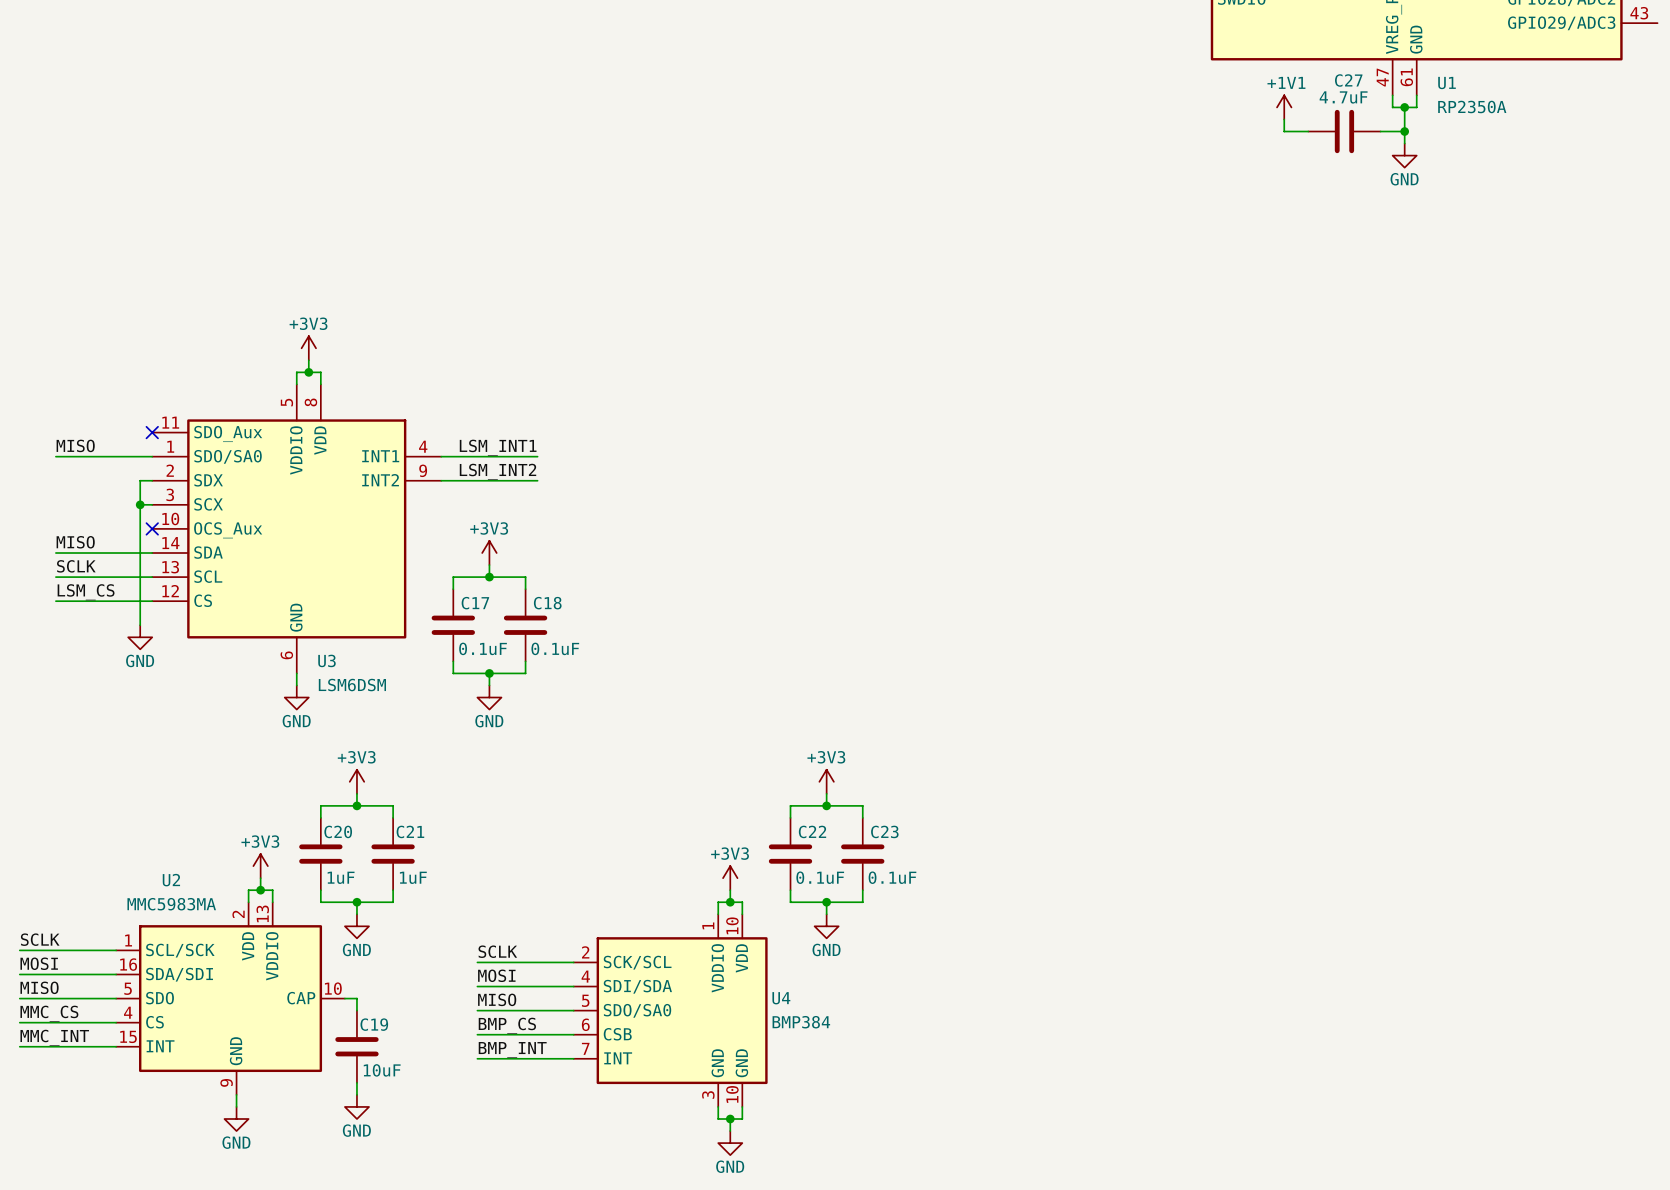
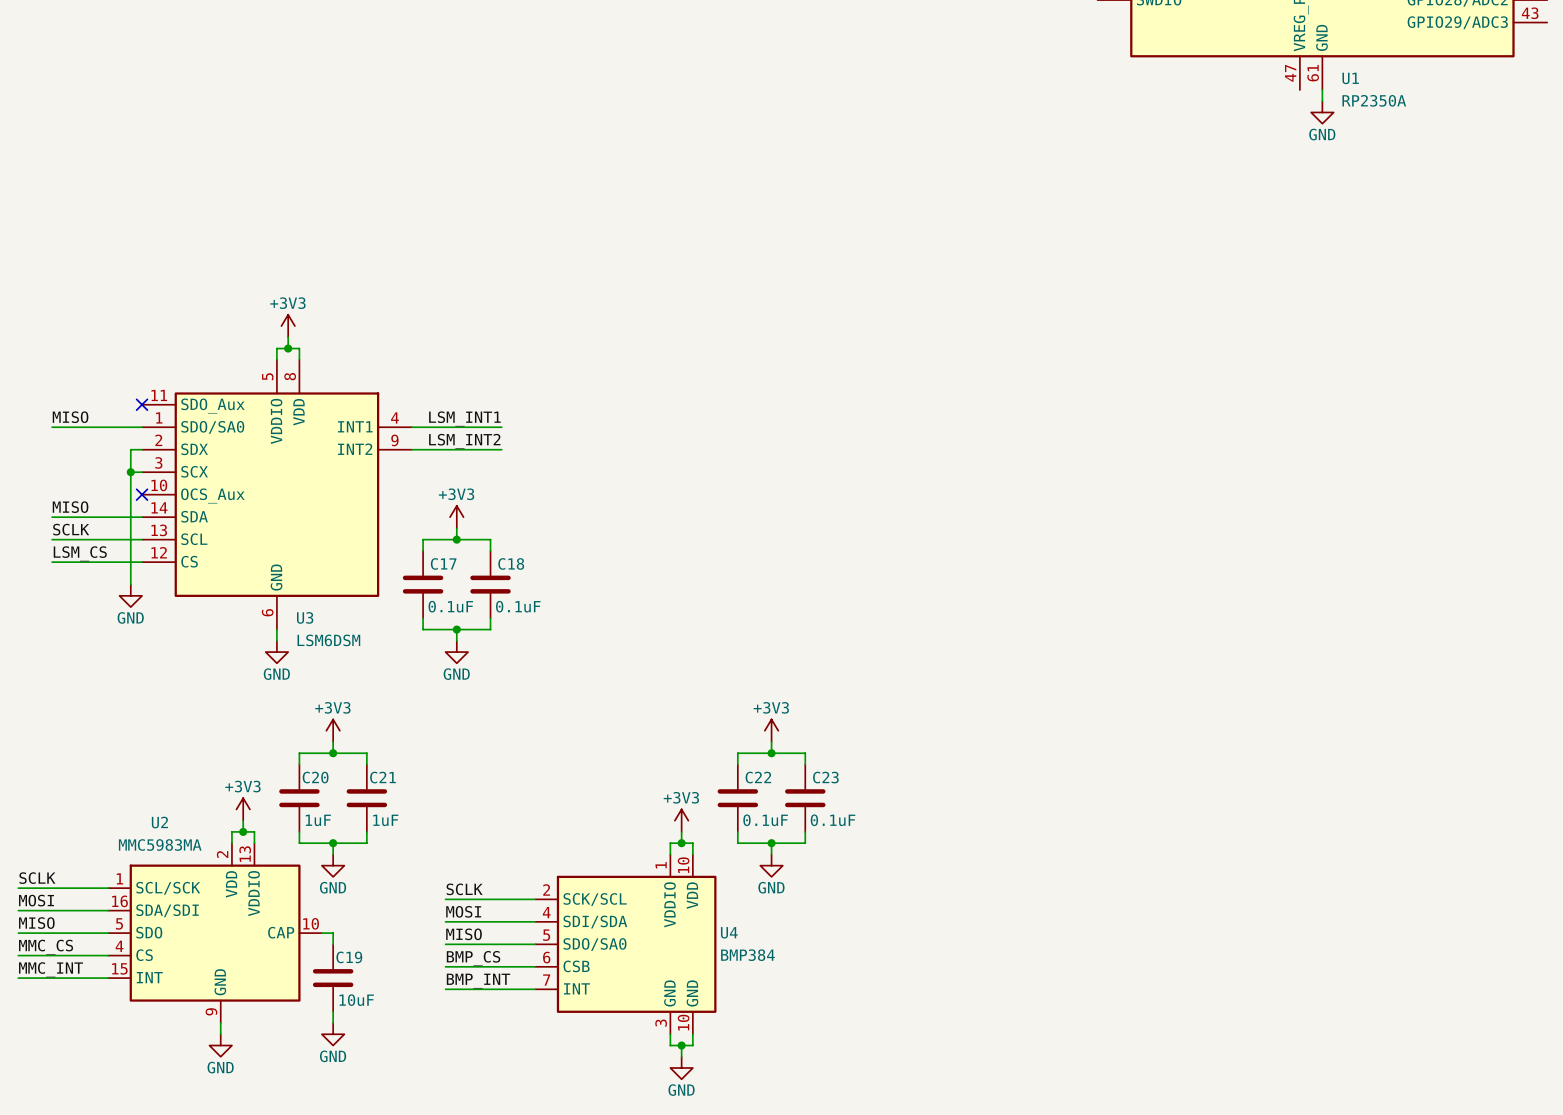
wire: (1392, 95) (1392, 107) (1416, 107) -> none
power symbol: +1V1 (1284, 107) -> none
wire: (1404, 107) (1404, 143) -> none
junction: (1404, 107) -> none
wire: (1284, 119) (1284, 131) (1308, 131) -> none
C27: 4.7uF (1344, 131) -> none
wire: (1380, 131) (1404, 131) -> none
junction: (1404, 131) -> none
power symbol position: GND (1404, 155) -> GND (1322, 112)

